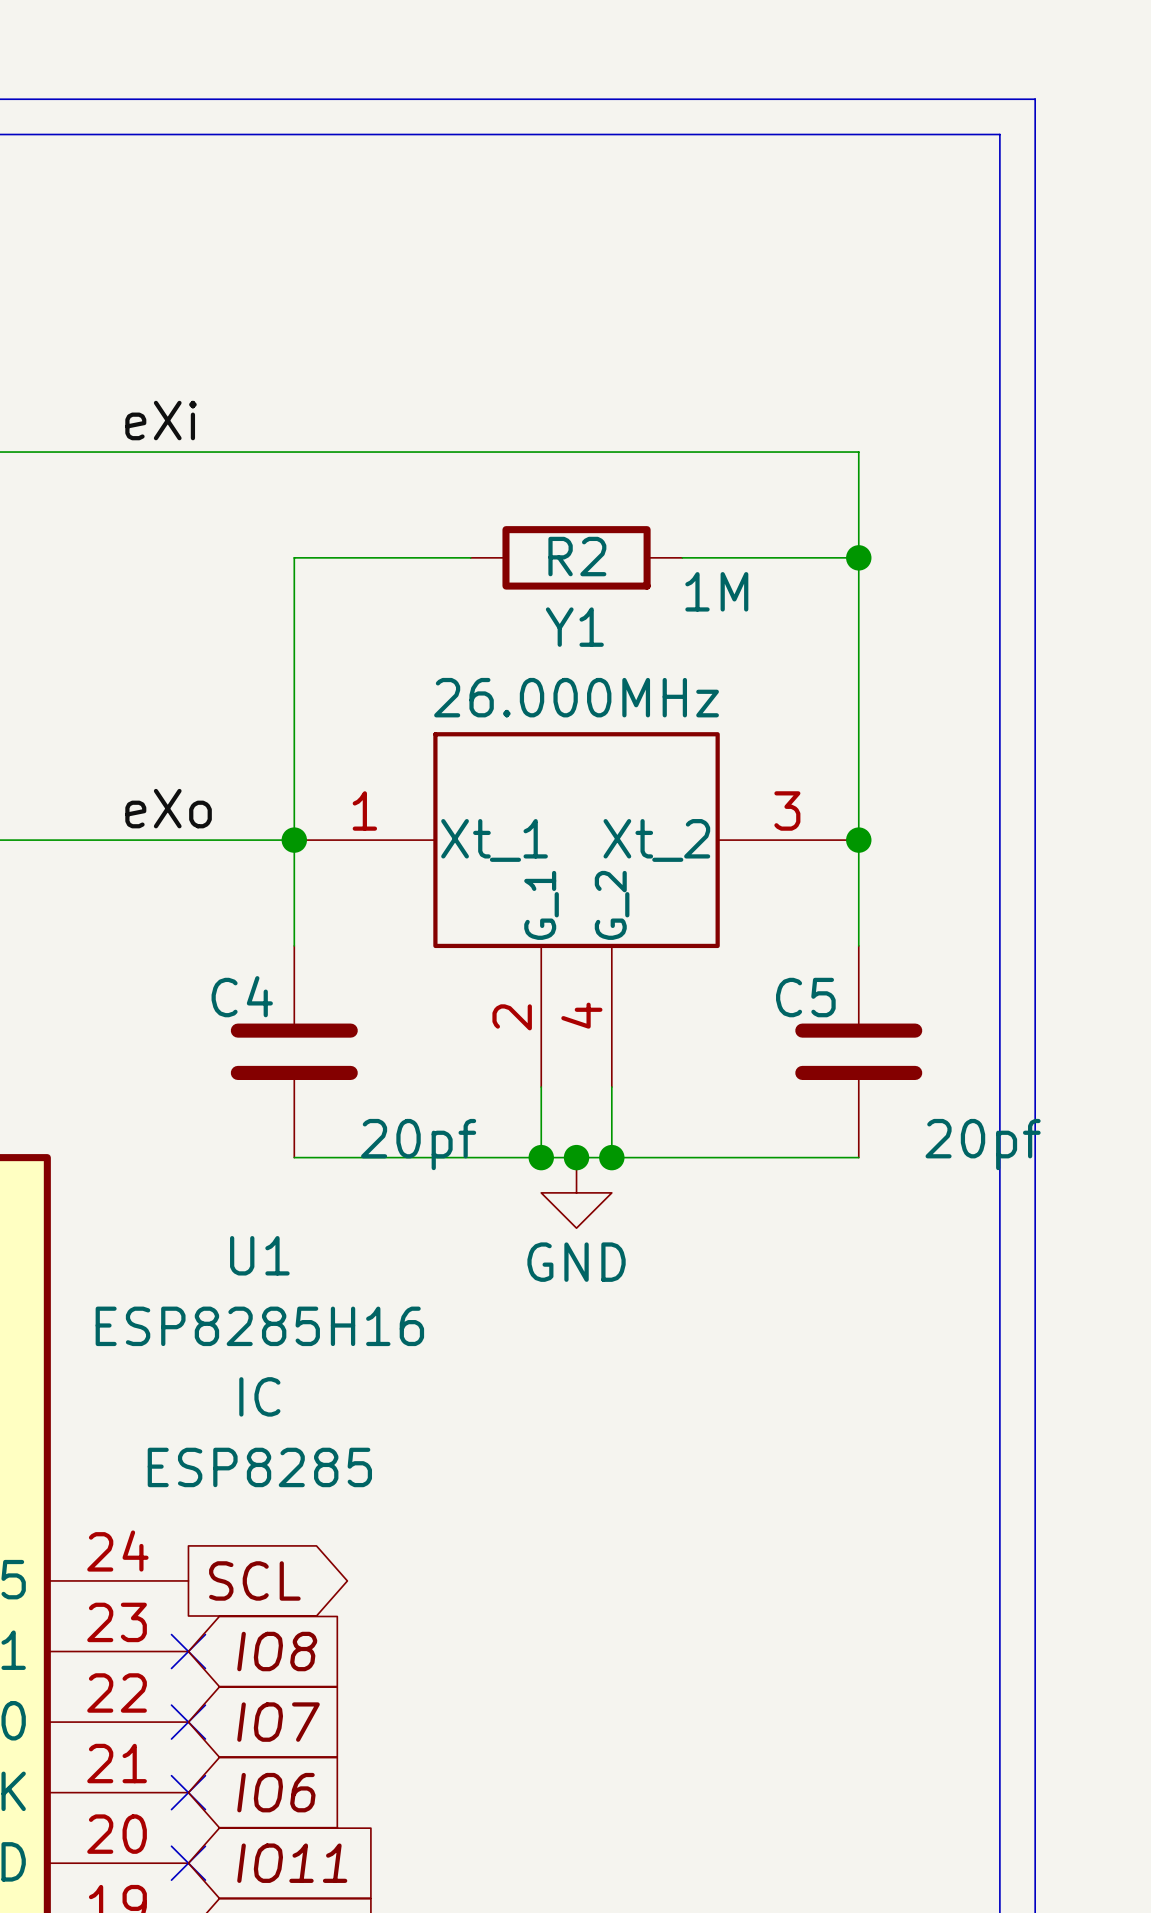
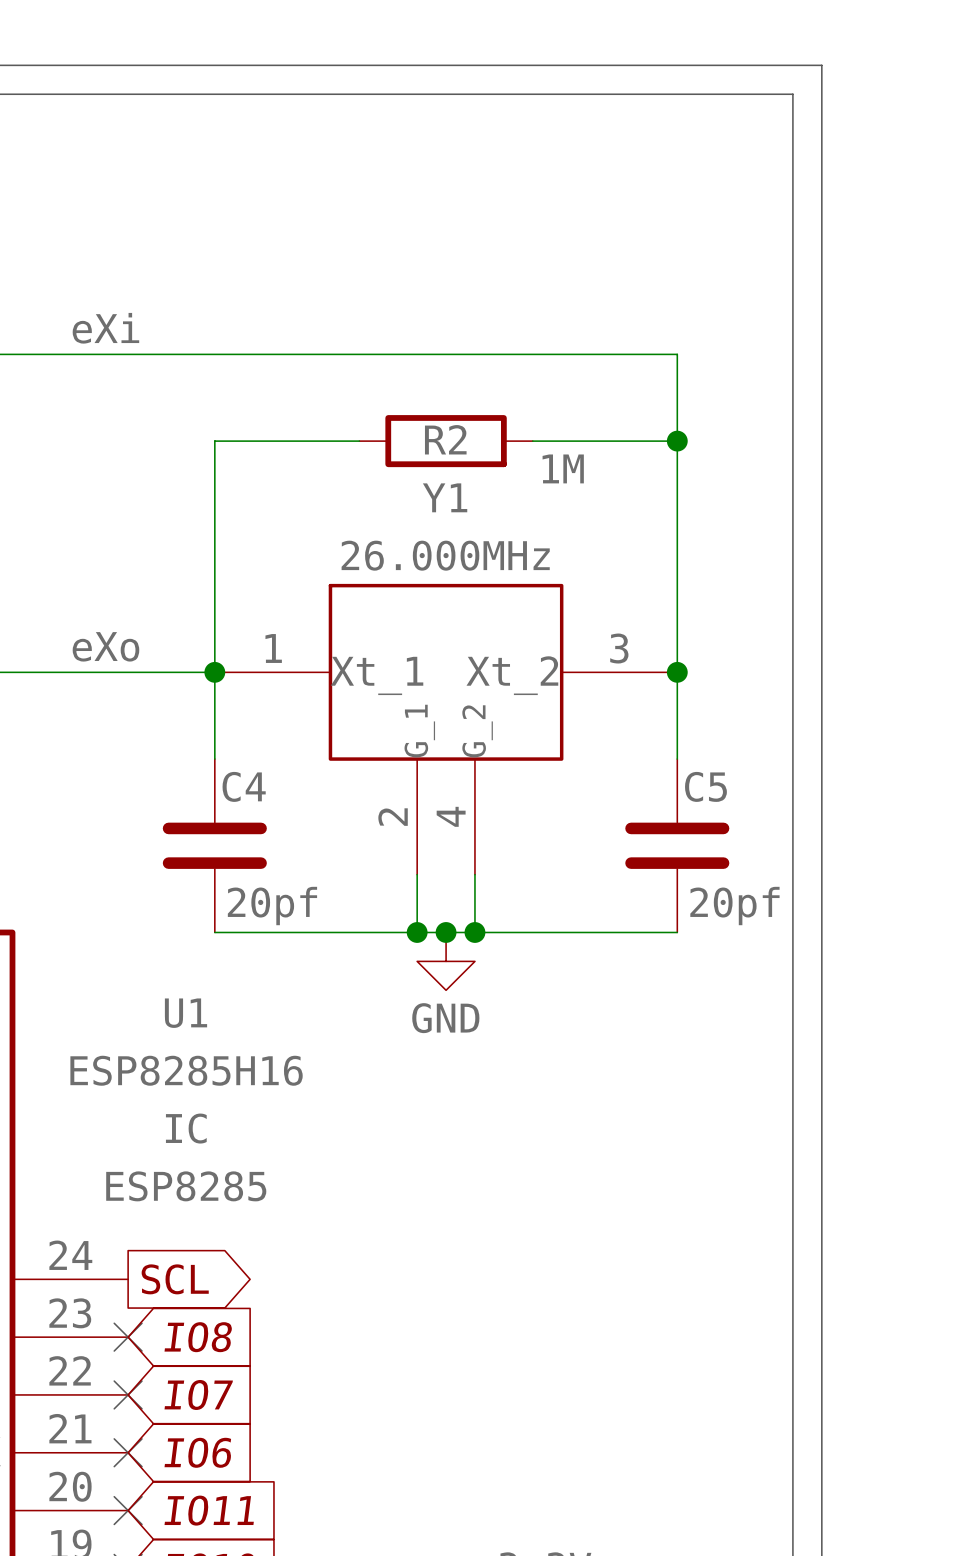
C4 name position: C4 (242, 996) -> C4 (244, 786)
C5 name position: C5 (805, 997) -> C5 (705, 786)
C4 value position: 20pf (418, 1144) -> 20pf (272, 906)
C5 value position: 20pf (983, 1144) -> 20pf (734, 906)

